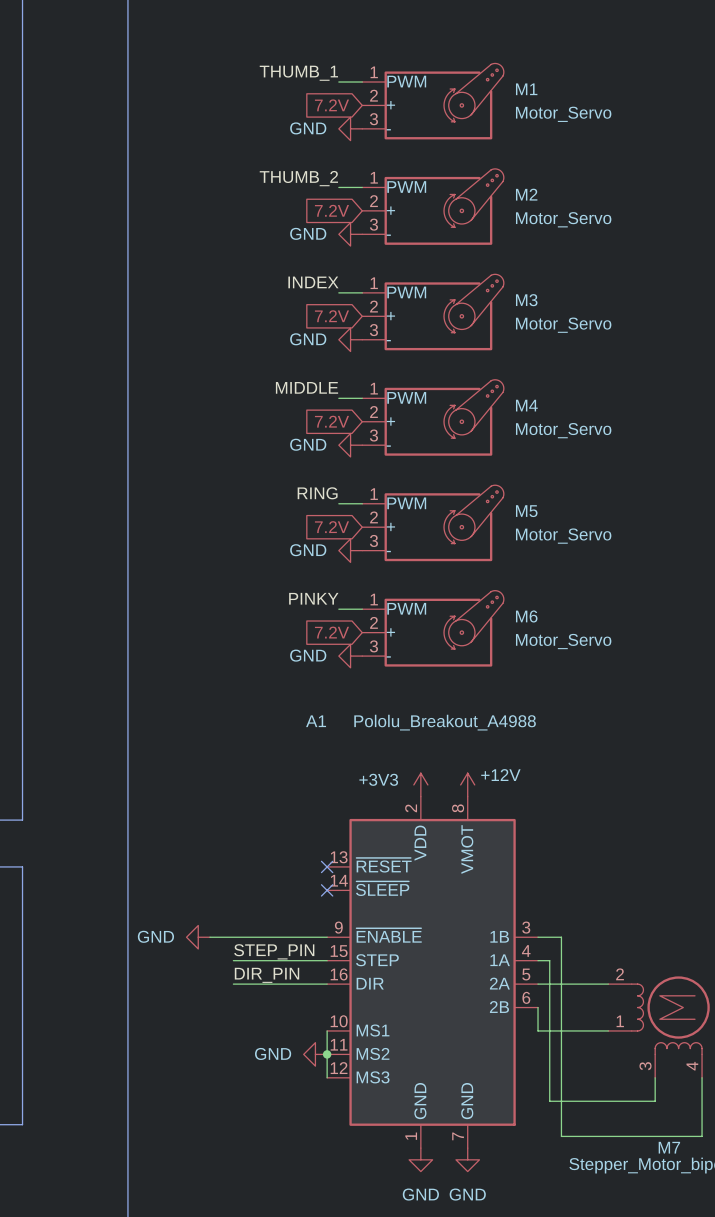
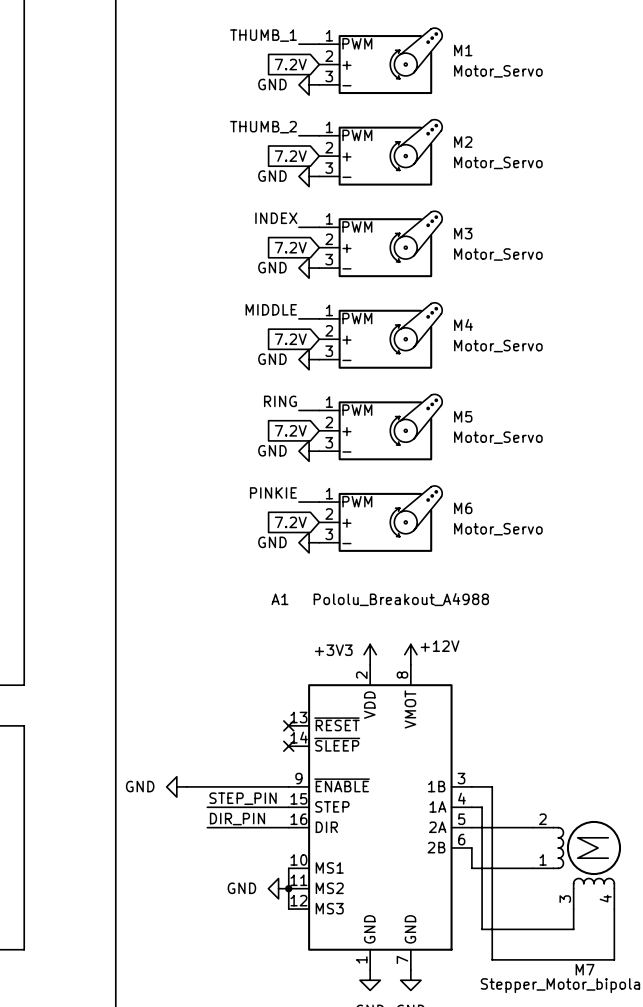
label: PINKY (313, 598) -> PINKIE (273, 492)

